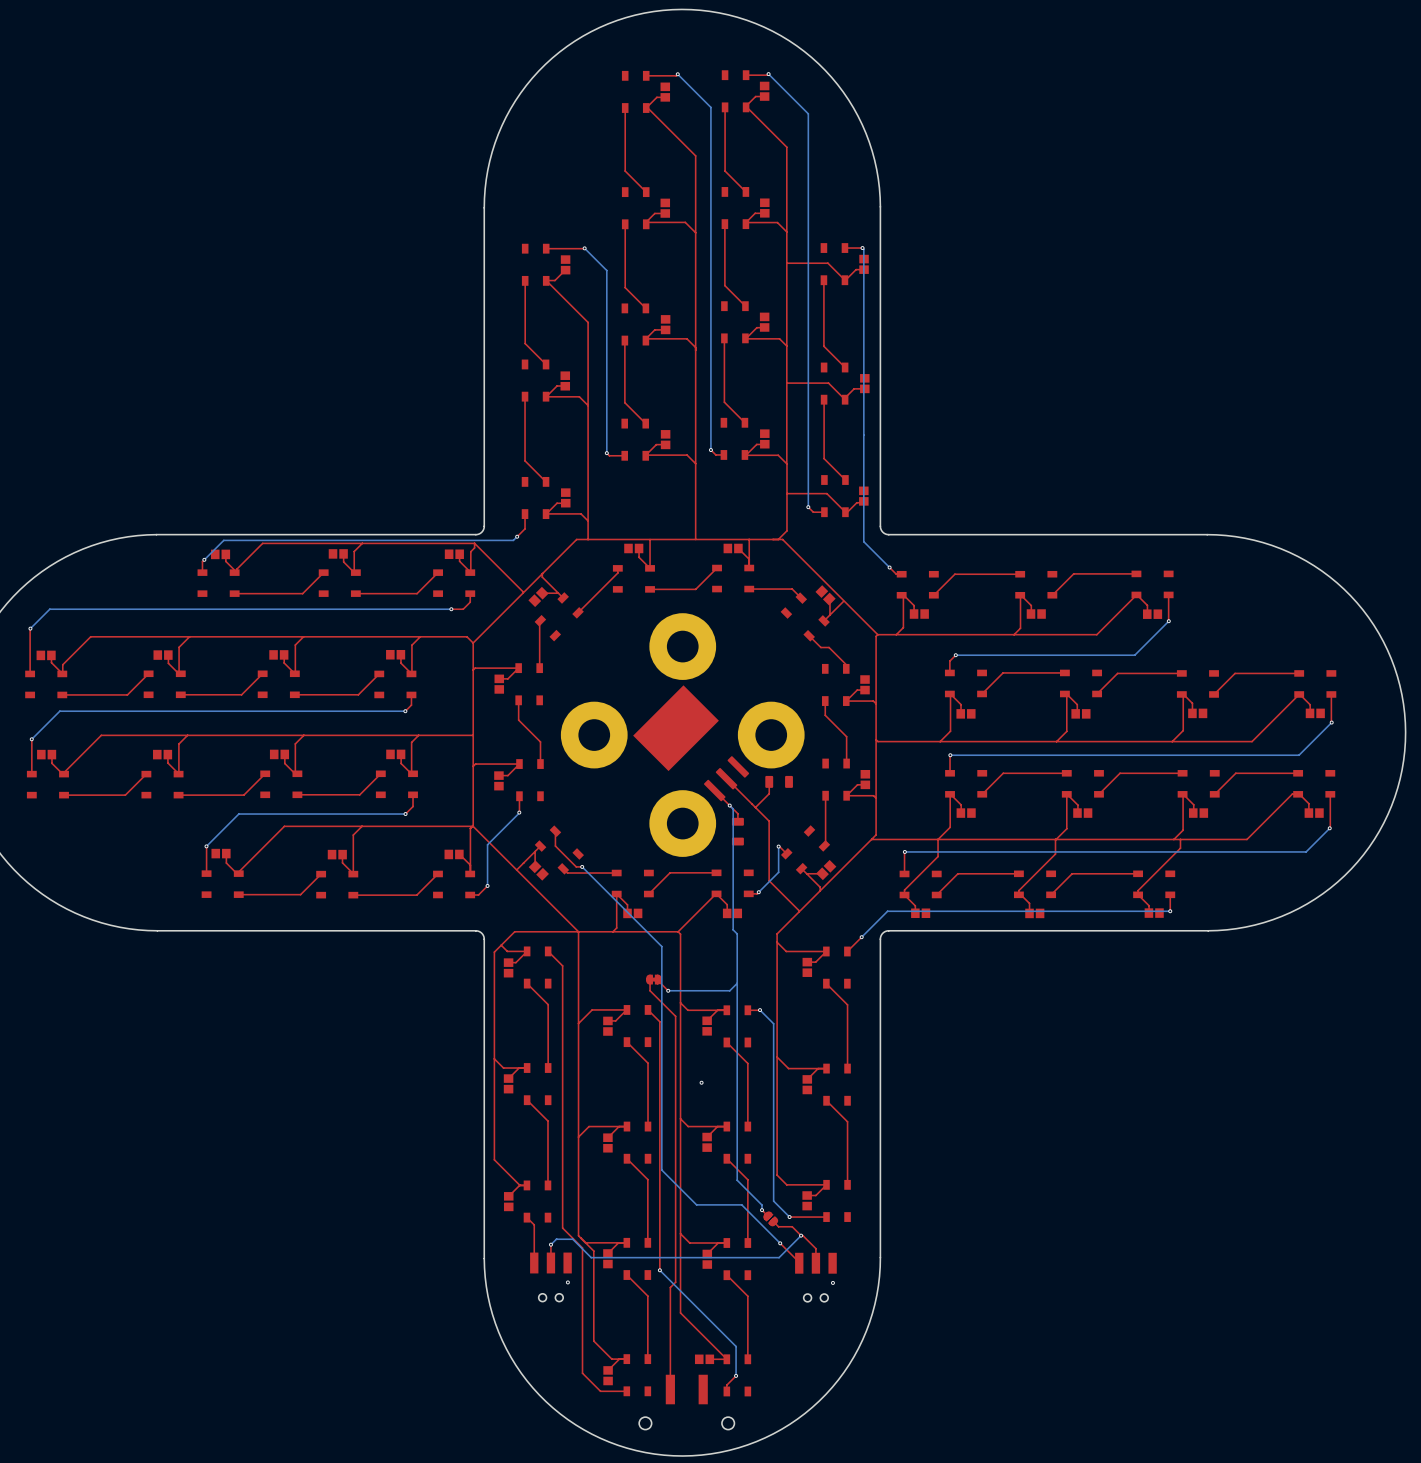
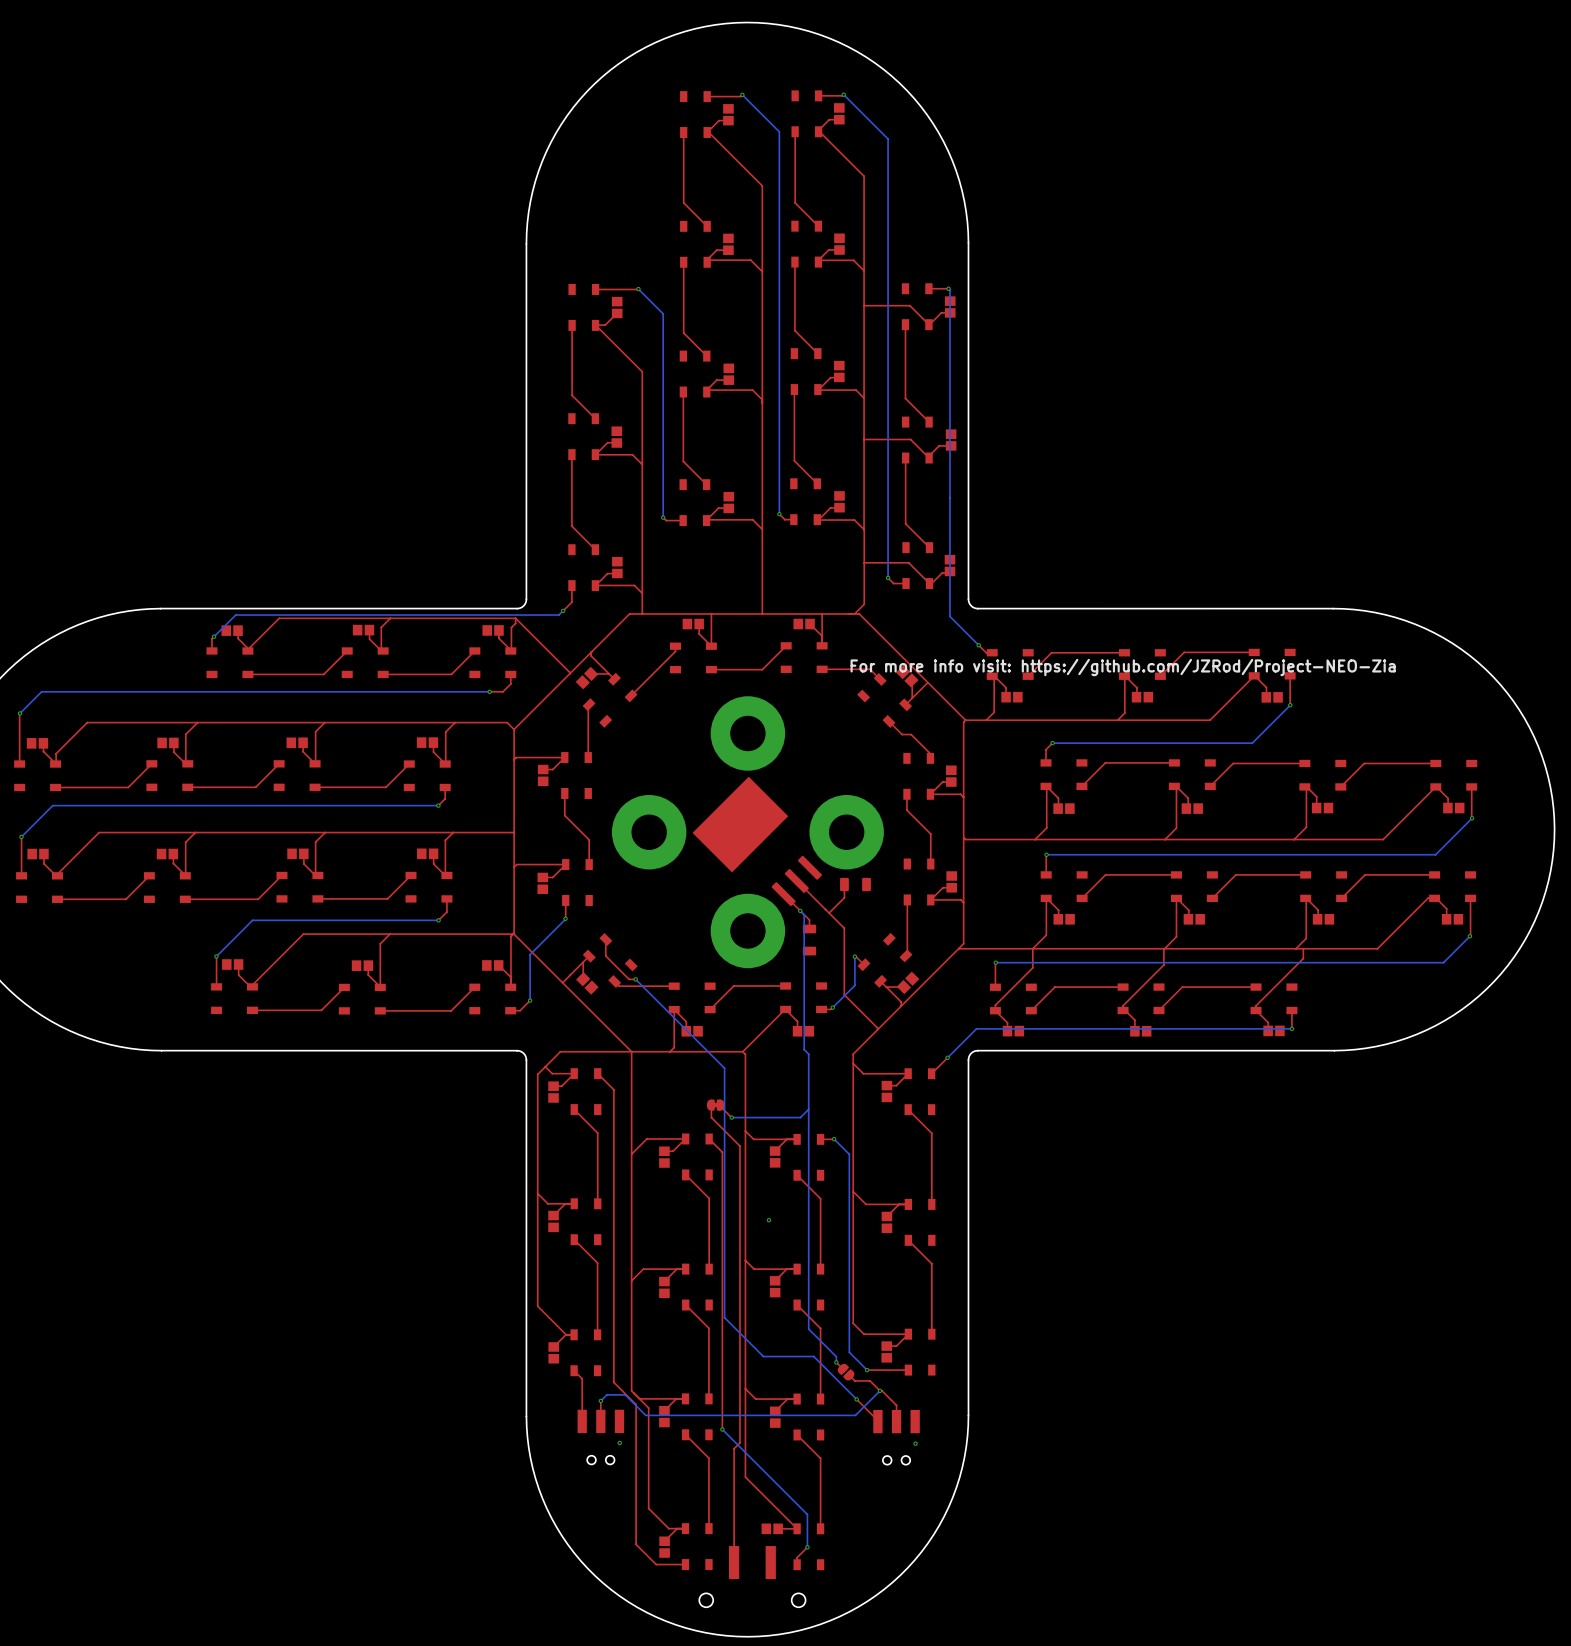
text: none -> For more info visit: https://github.com/JZRod/Project-NEO-Zia (1123, 667)

